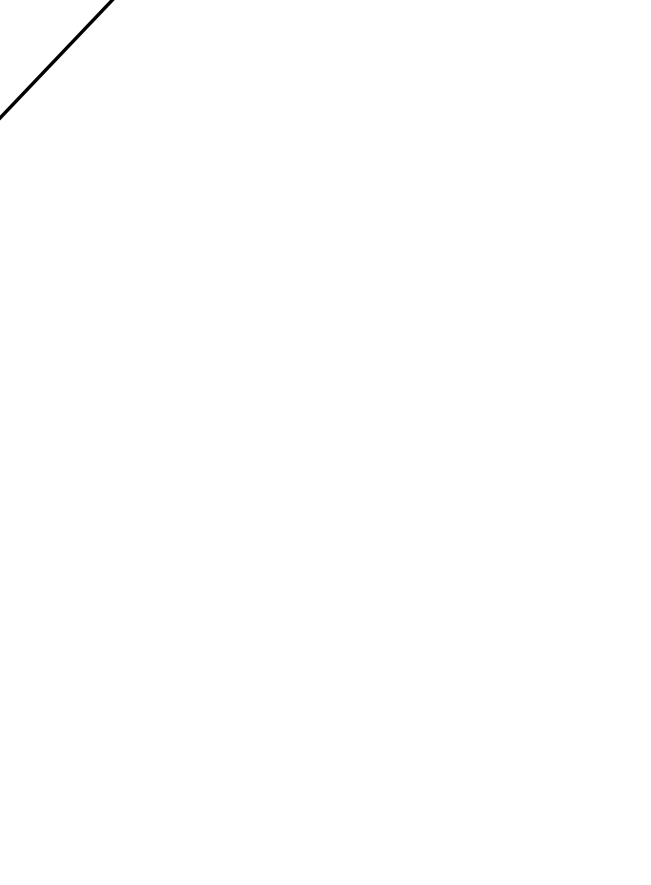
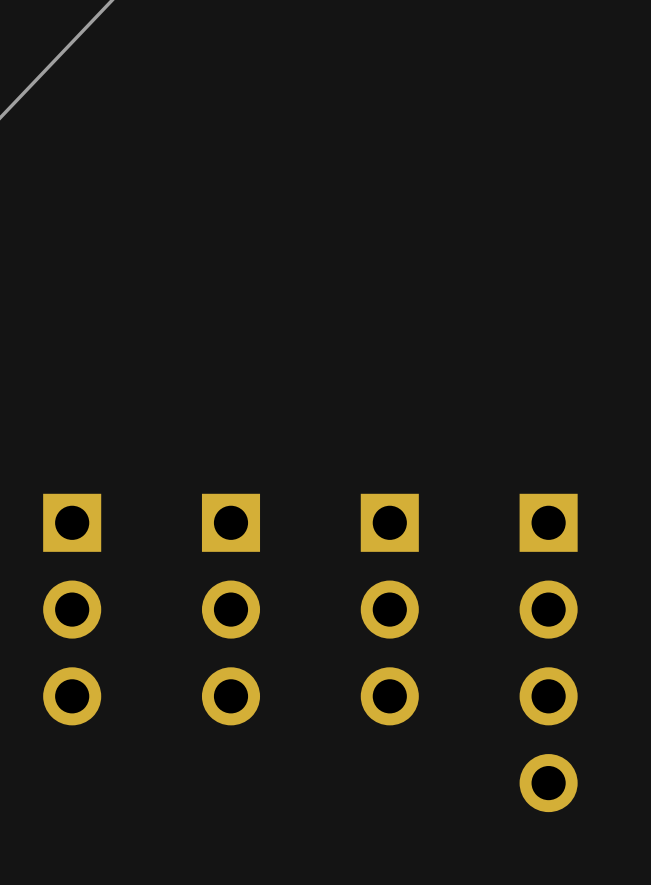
part: none -> (72, 609)
part: none -> (230, 609)
part: none -> (389, 609)
part: none -> (548, 652)

